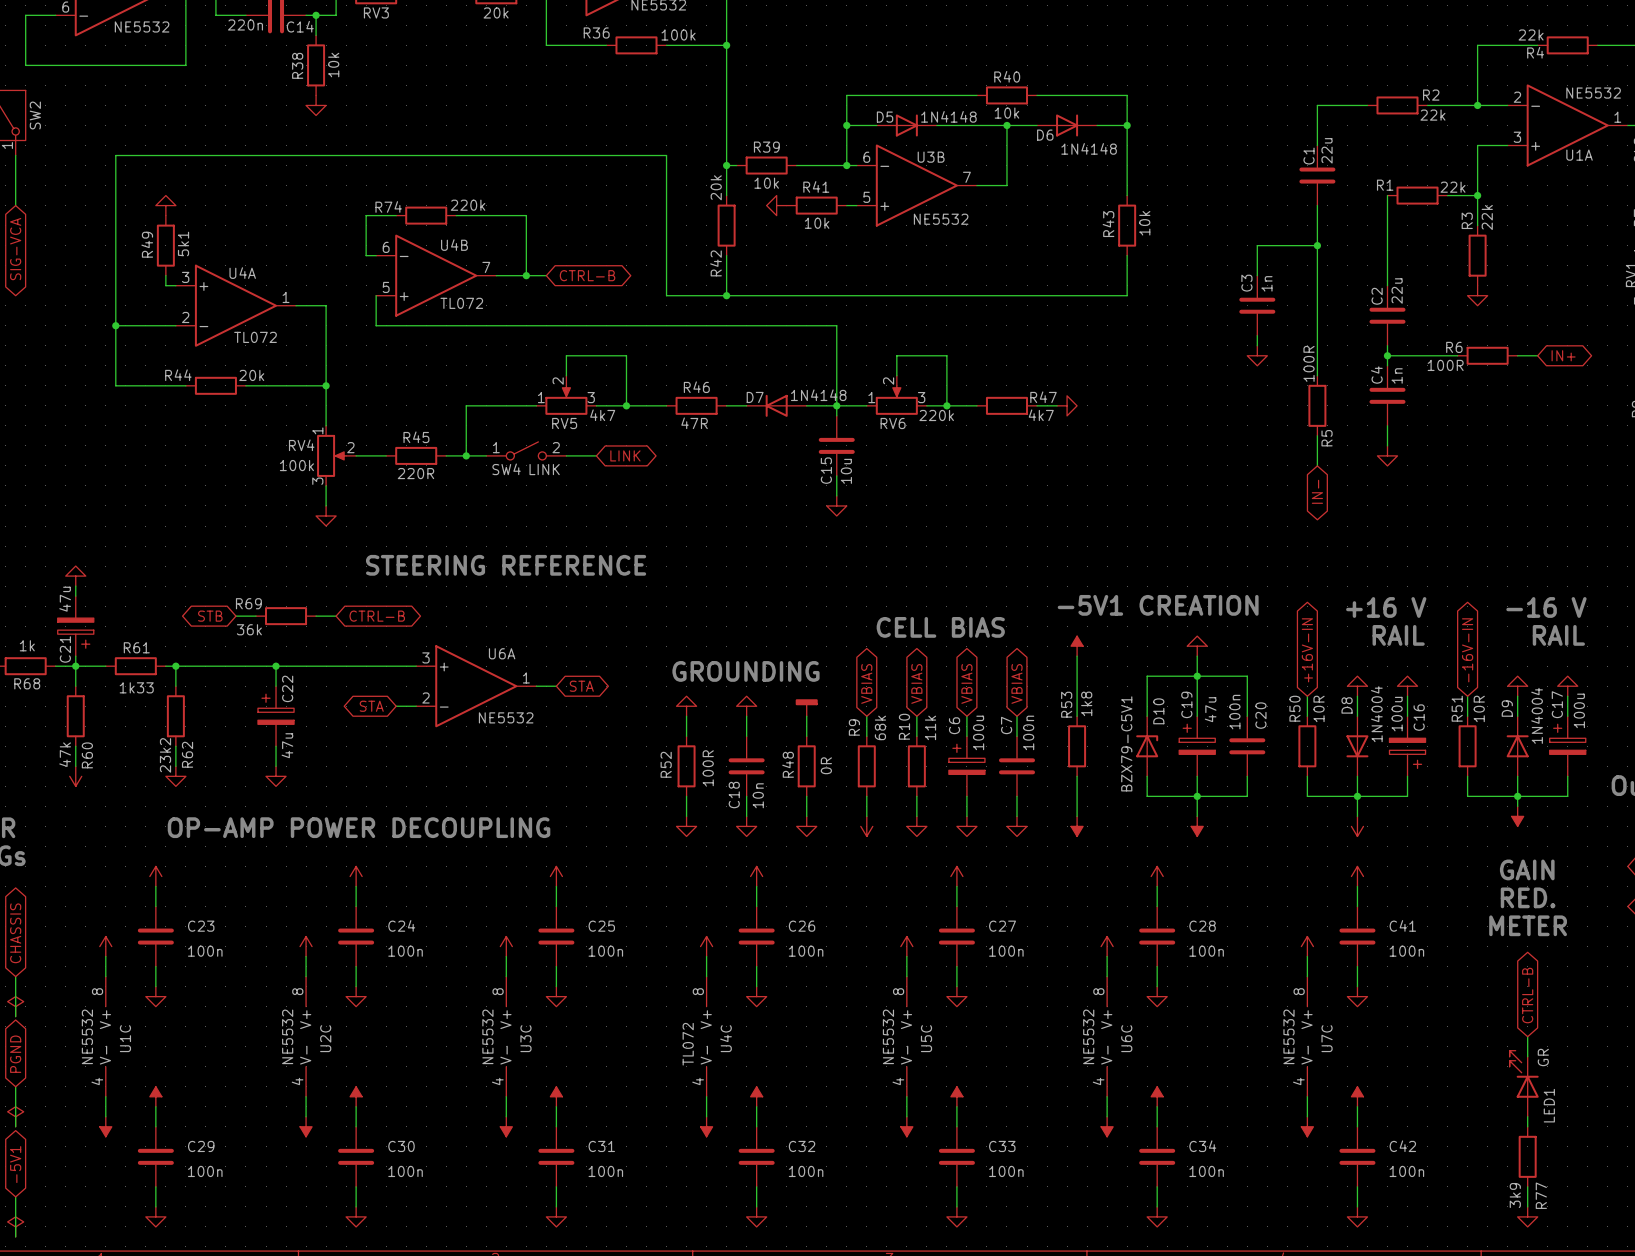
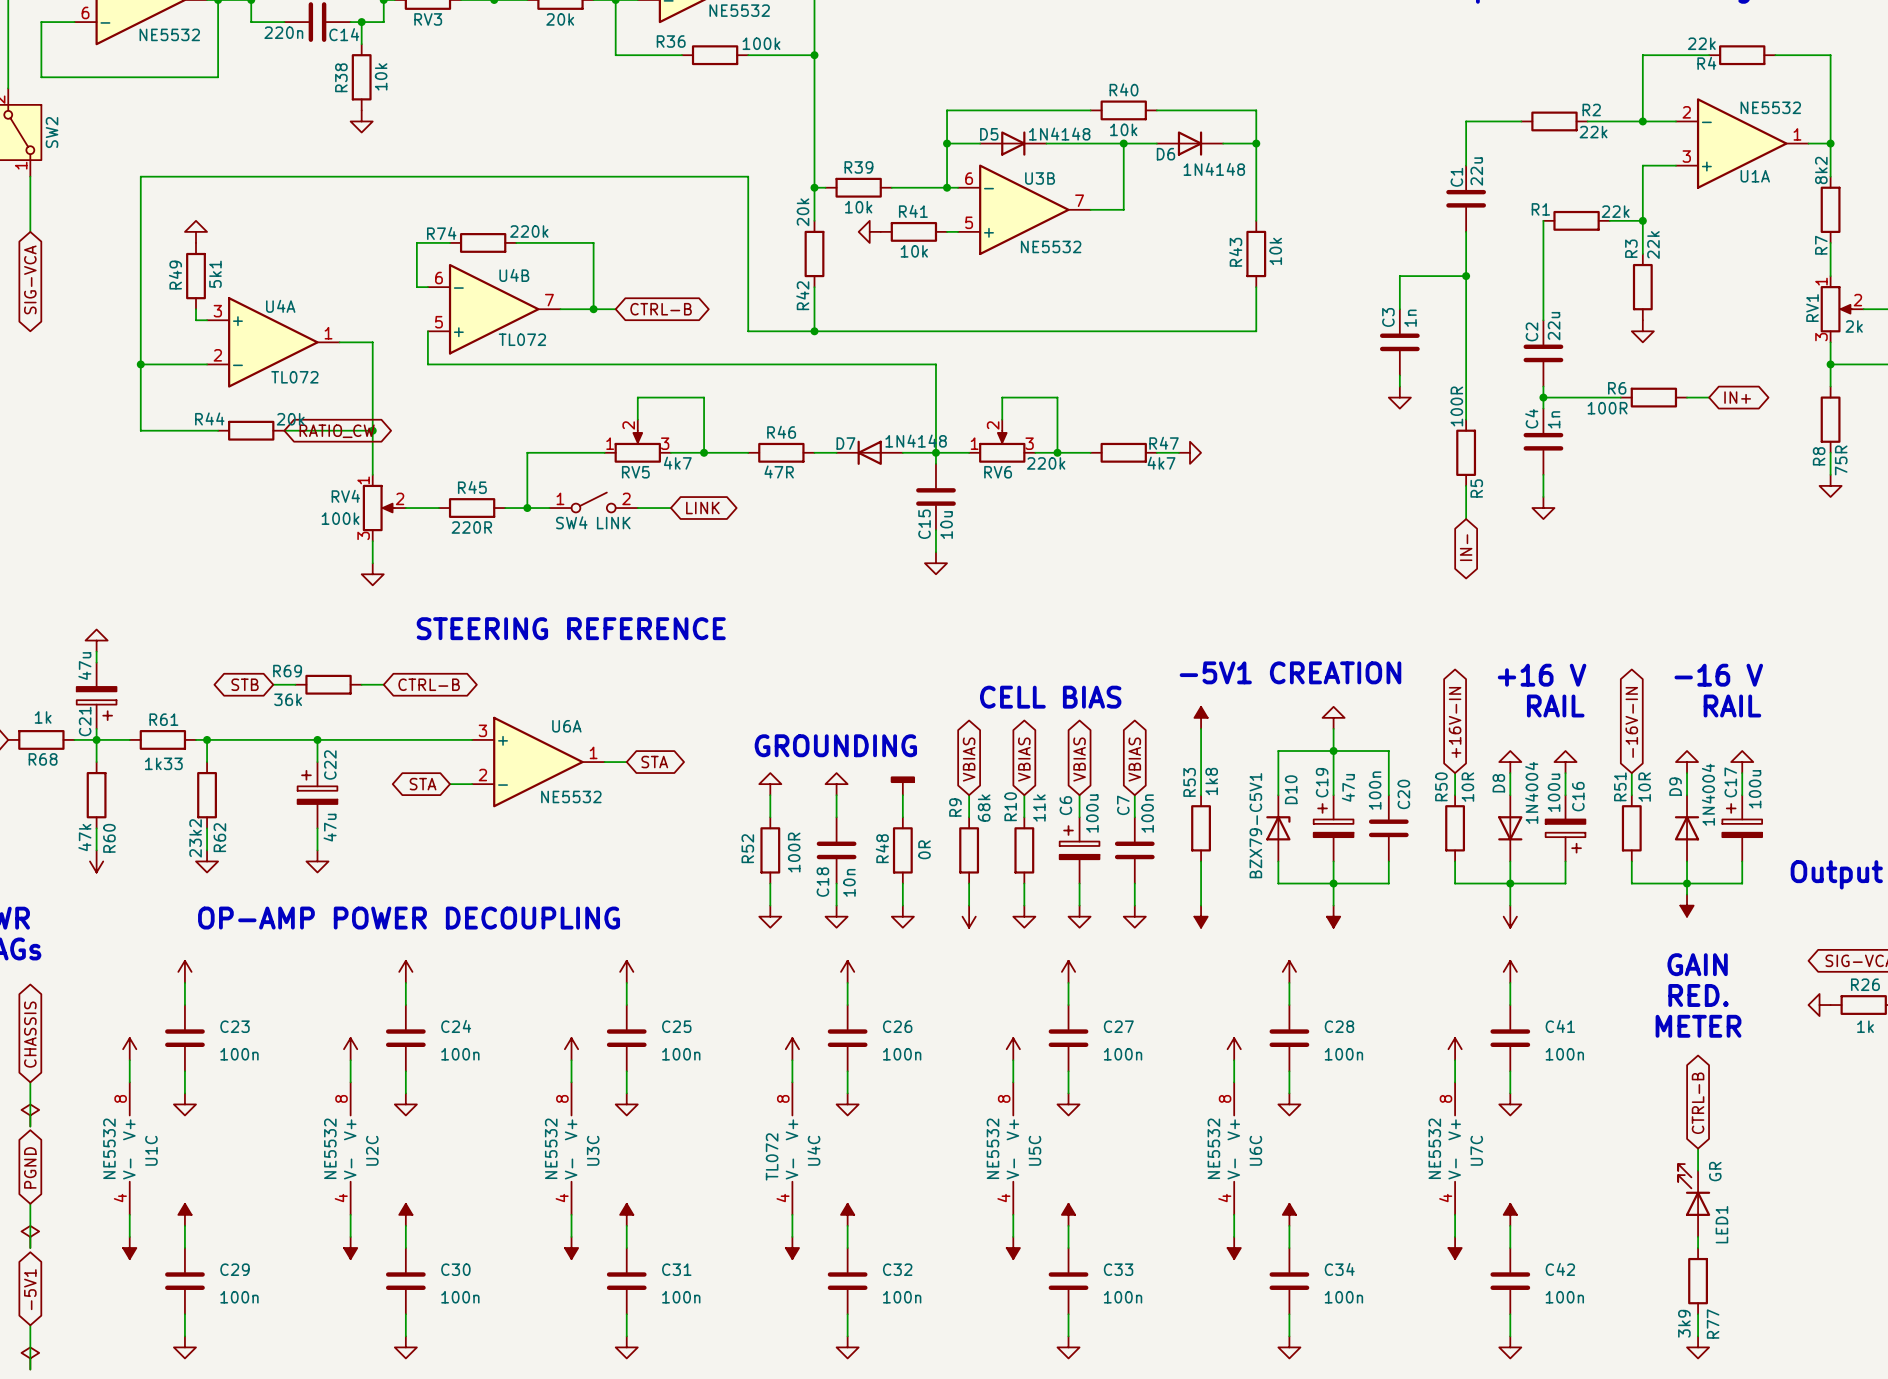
global label: none -> RATIO_CW (337, 431)

